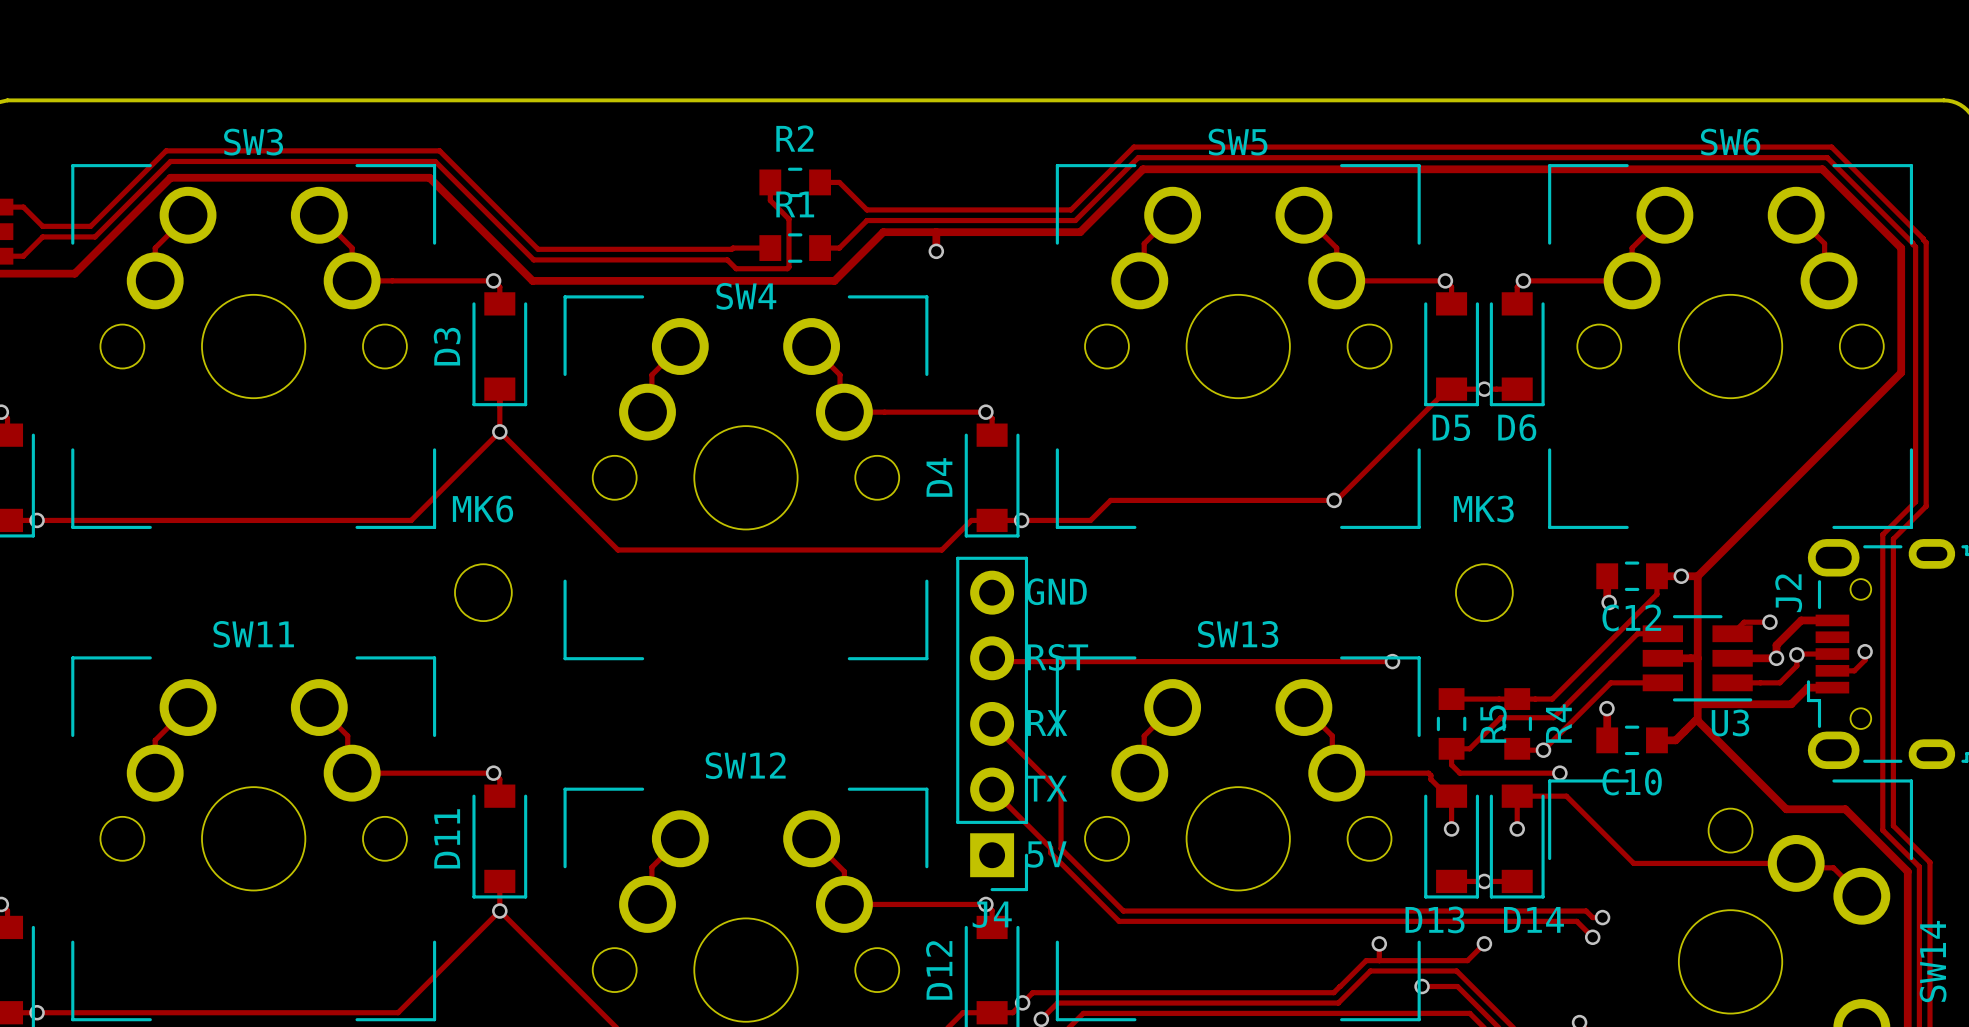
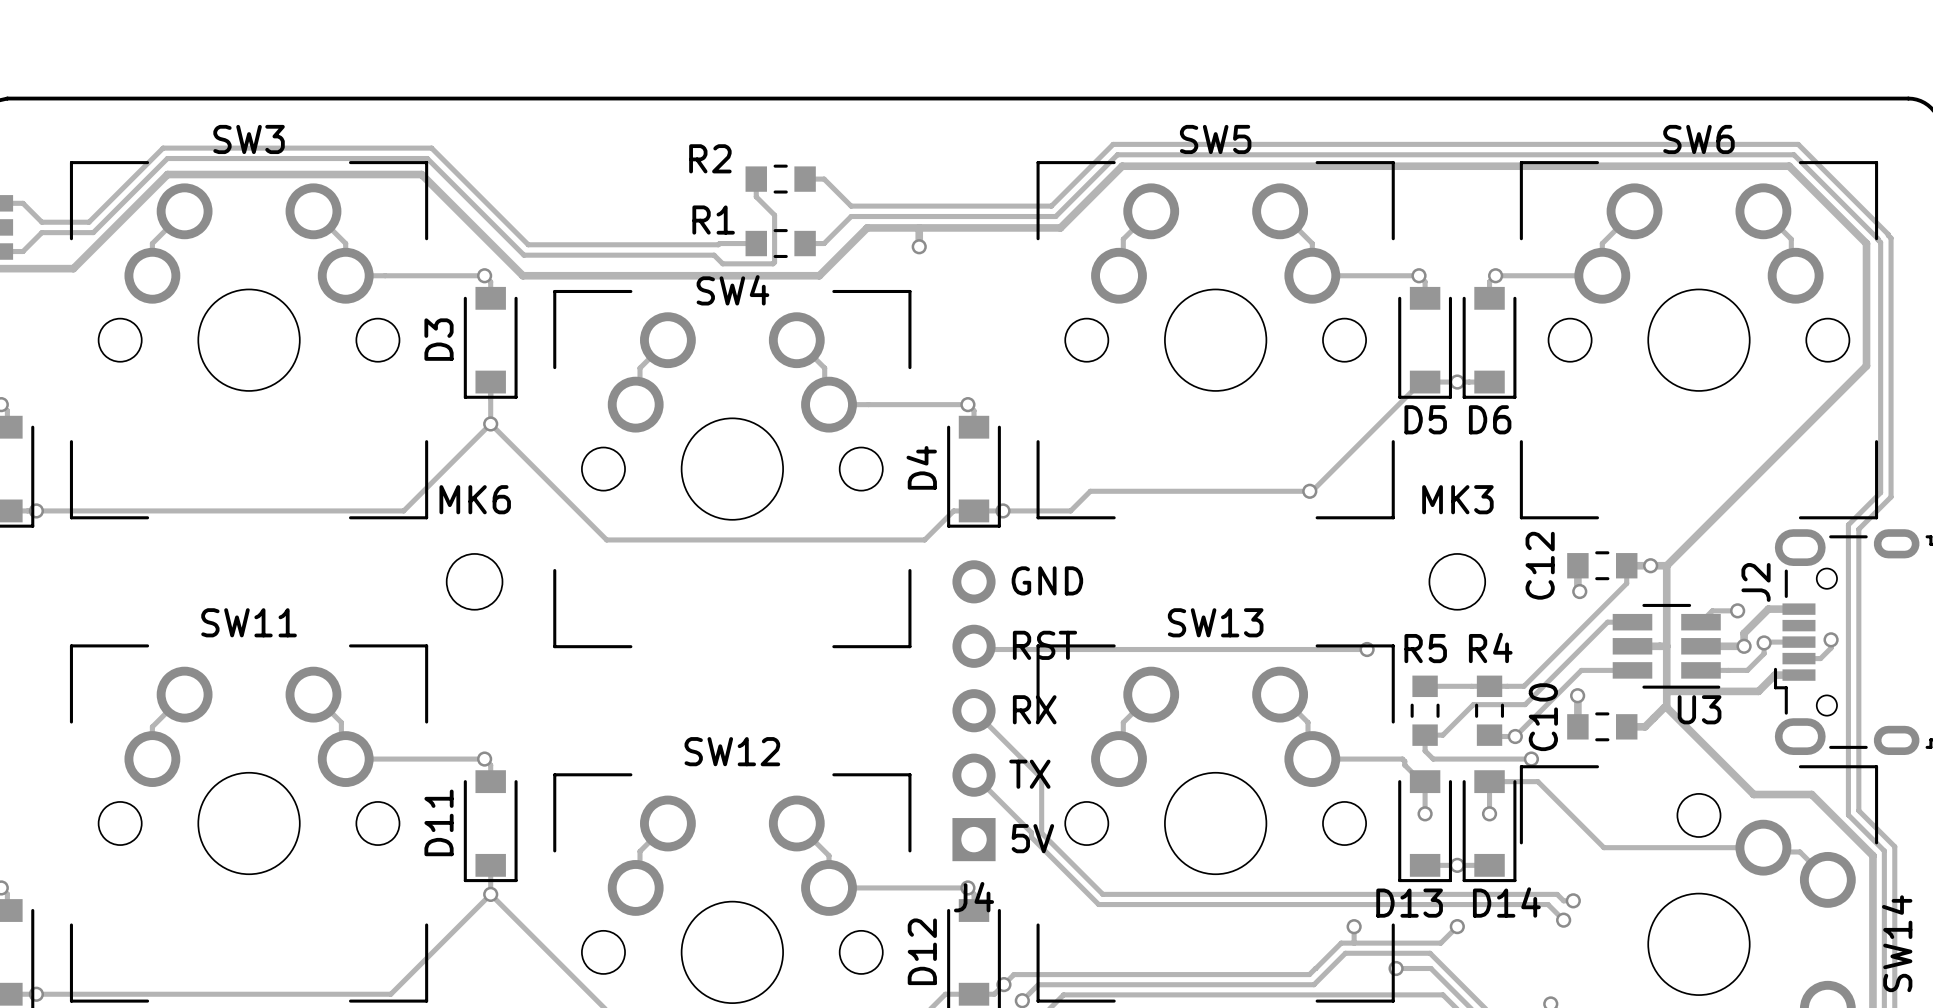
R2 name position: R2 (794, 138) -> R2 (710, 158)
R1 name position: R1 (795, 204) -> R1 (713, 220)
J4 footprint: [956, 556, 1029, 892] -> [952, 560, 996, 862]
C12 name rotation: 0° (1631, 617) -> 90° counterclockwise (1540, 565)
R4 name rotation: 0° (1558, 723) -> 90° clockwise (1490, 647)
R4 name position: R4 (1558, 723) -> R4 (1490, 647)
R5 name rotation: 0° (1493, 724) -> 90° clockwise (1425, 648)
R5 name position: R5 (1493, 724) -> R5 (1425, 648)
C10 name rotation: 0° (1632, 782) -> 90° counterclockwise (1543, 717)

